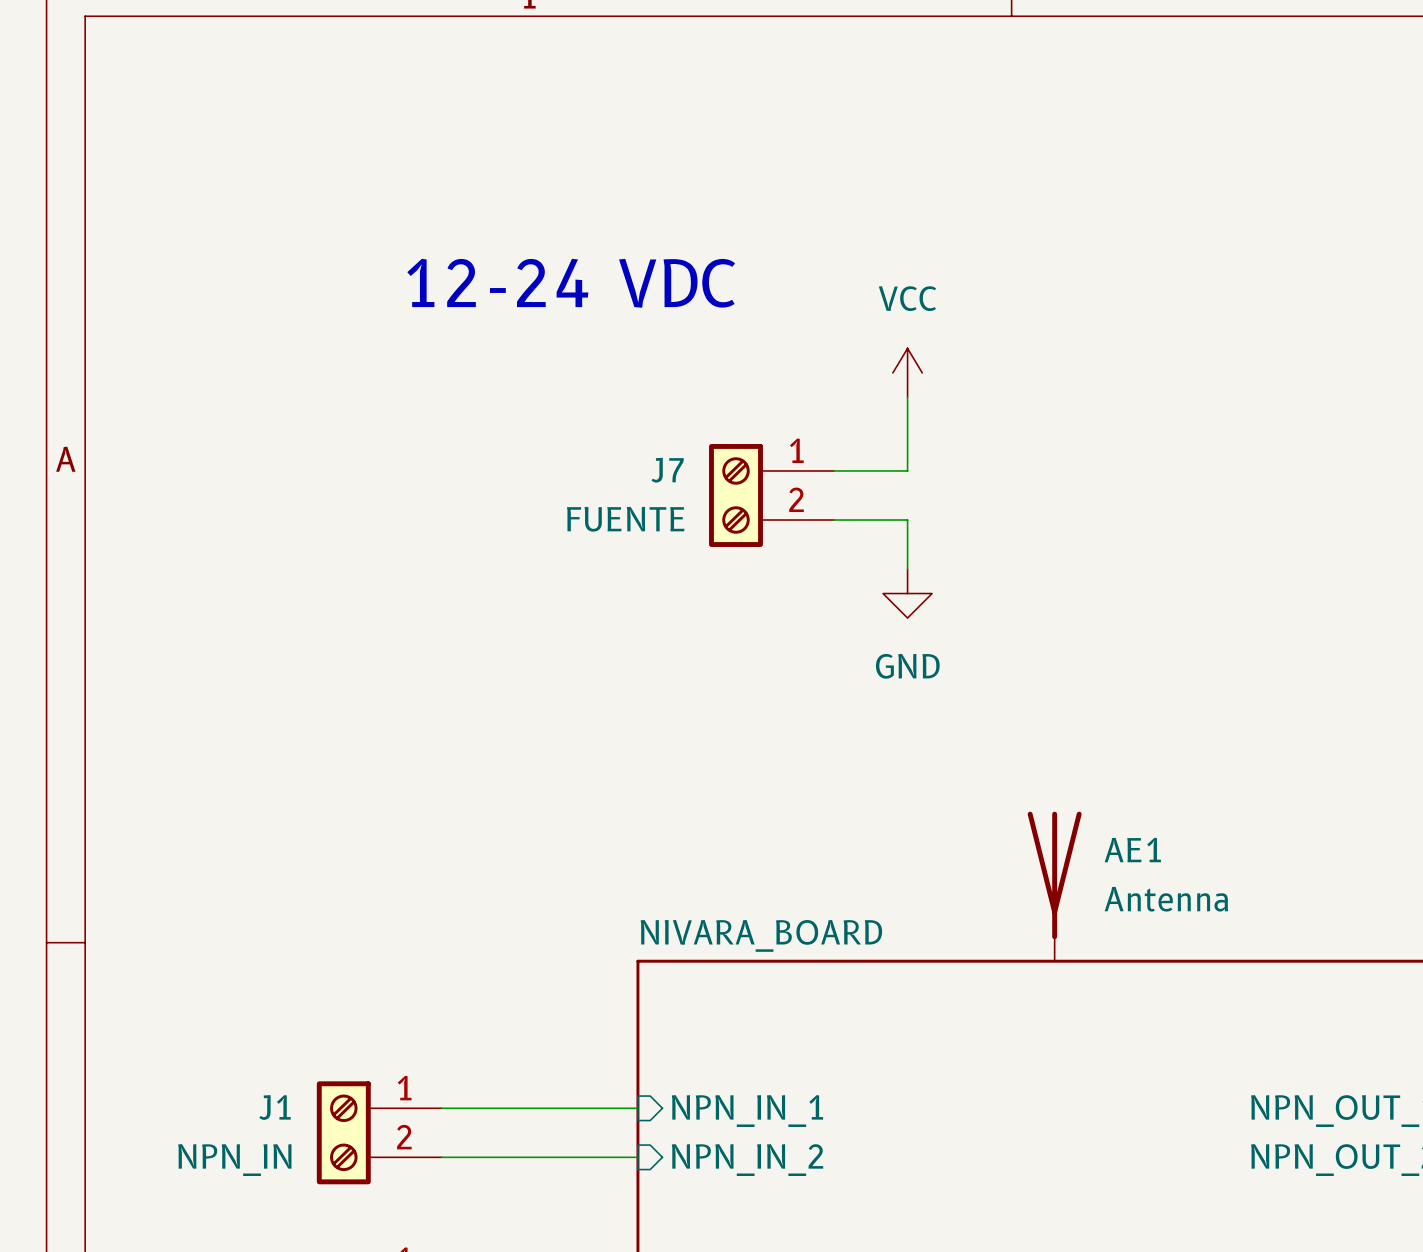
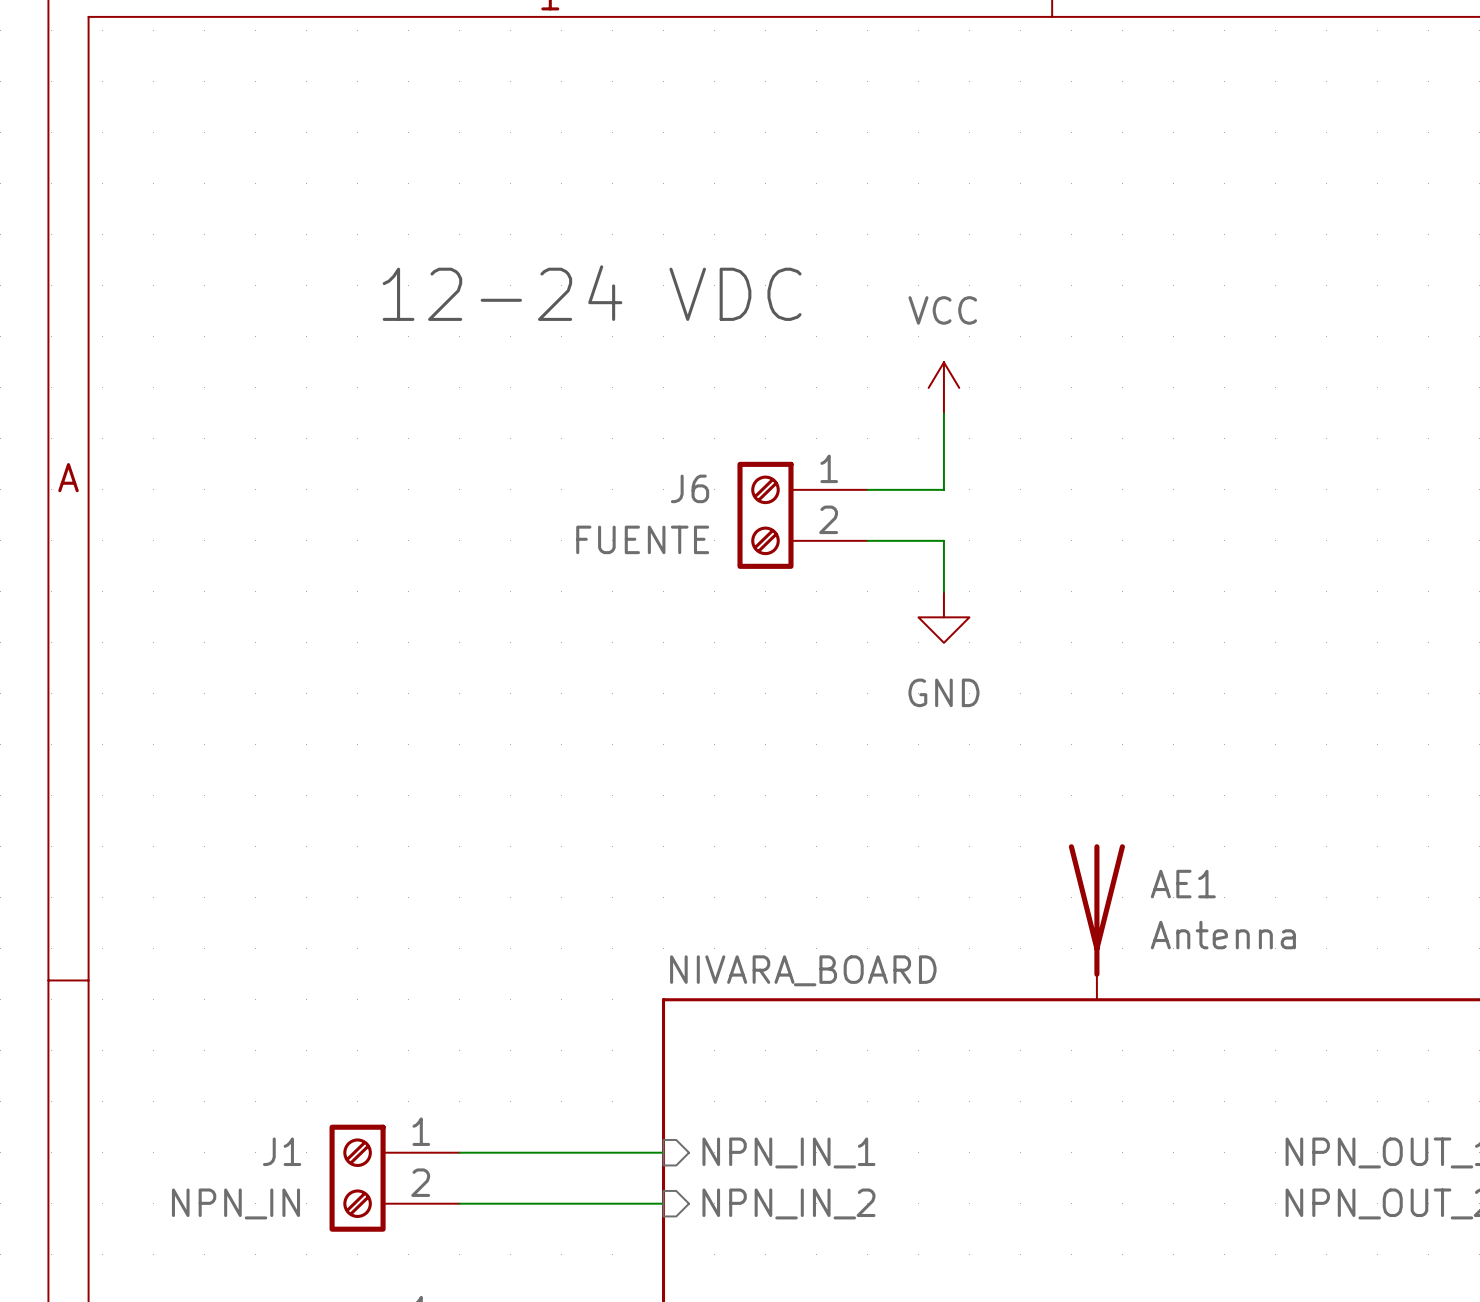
J7 name: J7 (667, 470) -> J6 (690, 488)

